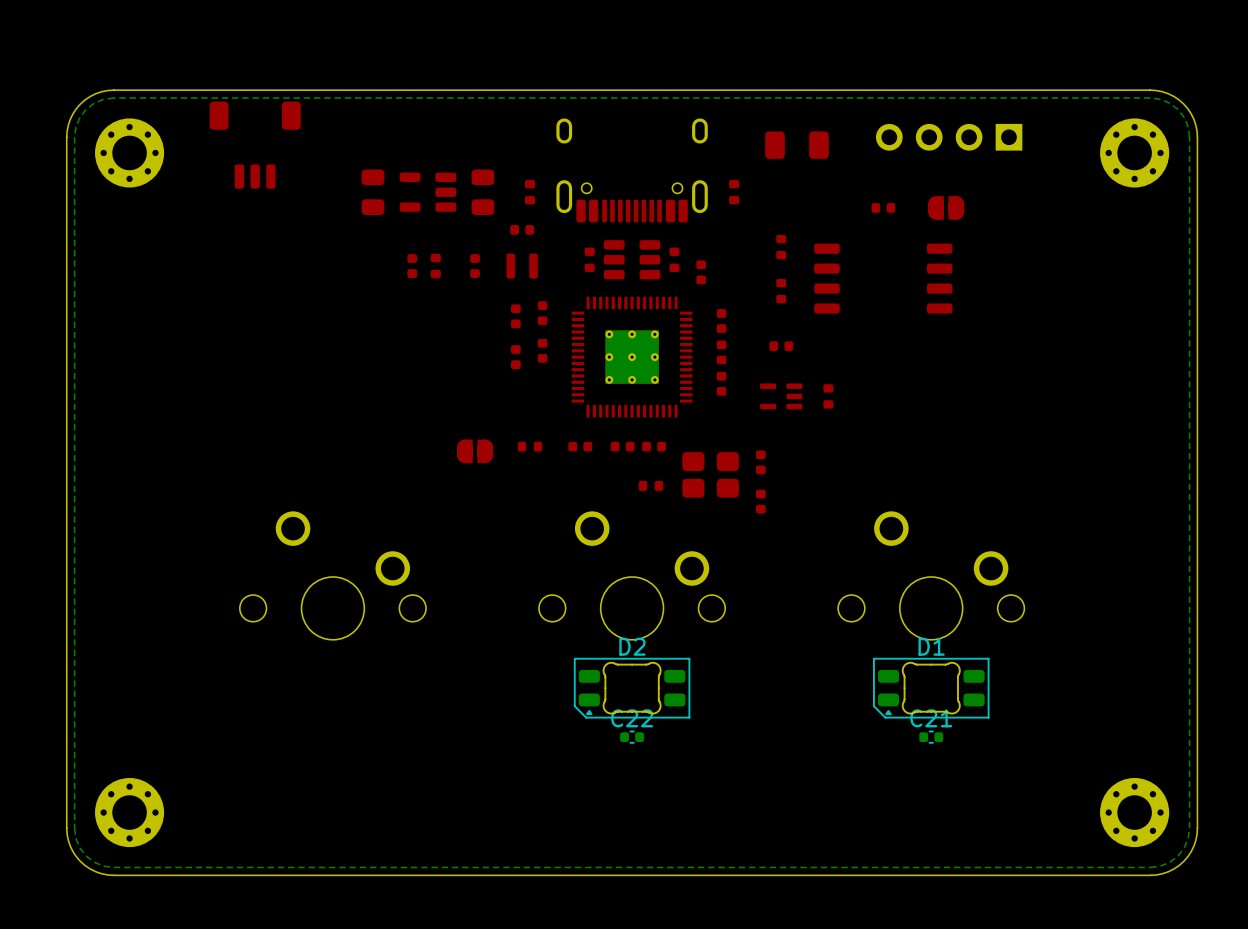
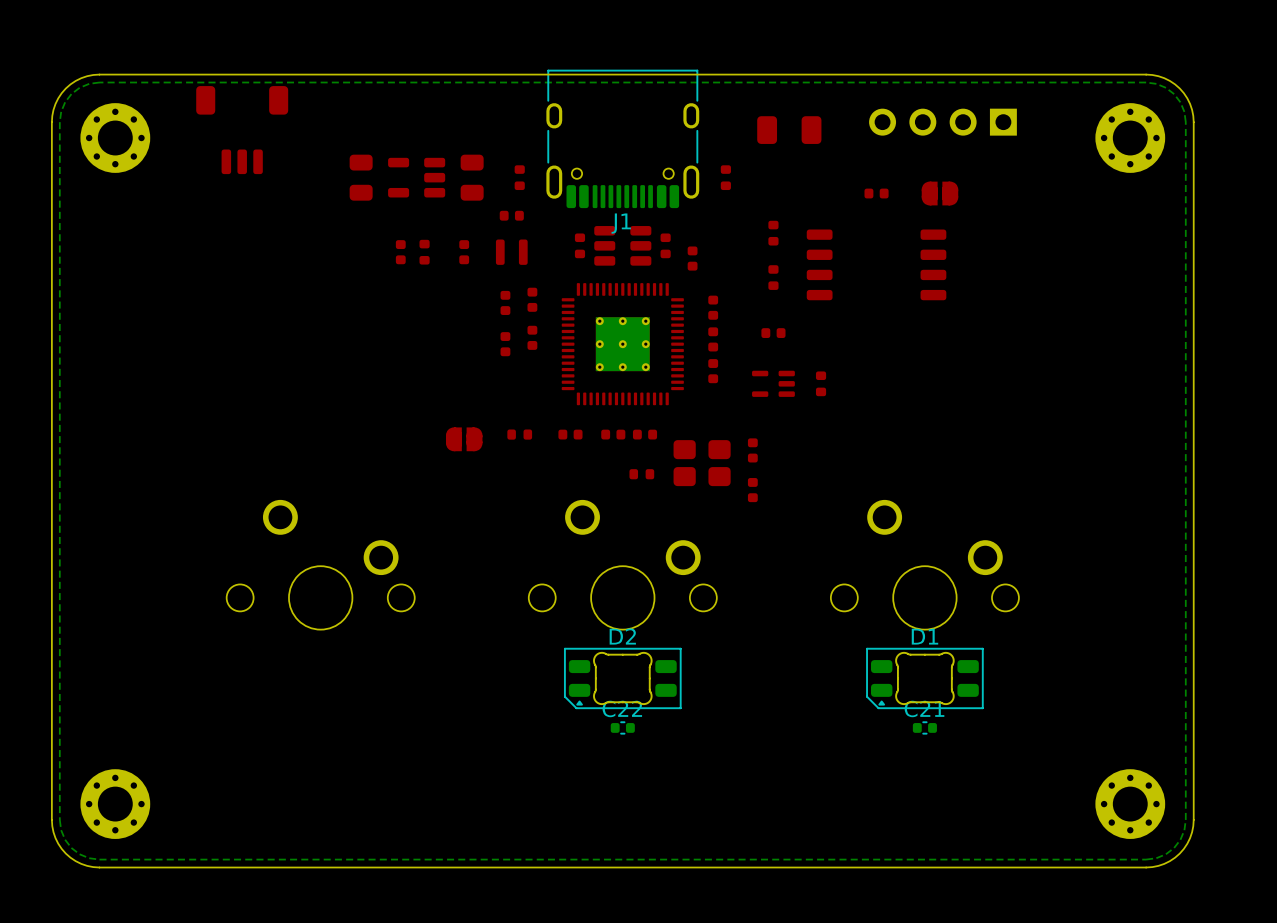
J1 side: top (632, 170) -> bottom (622, 138)

